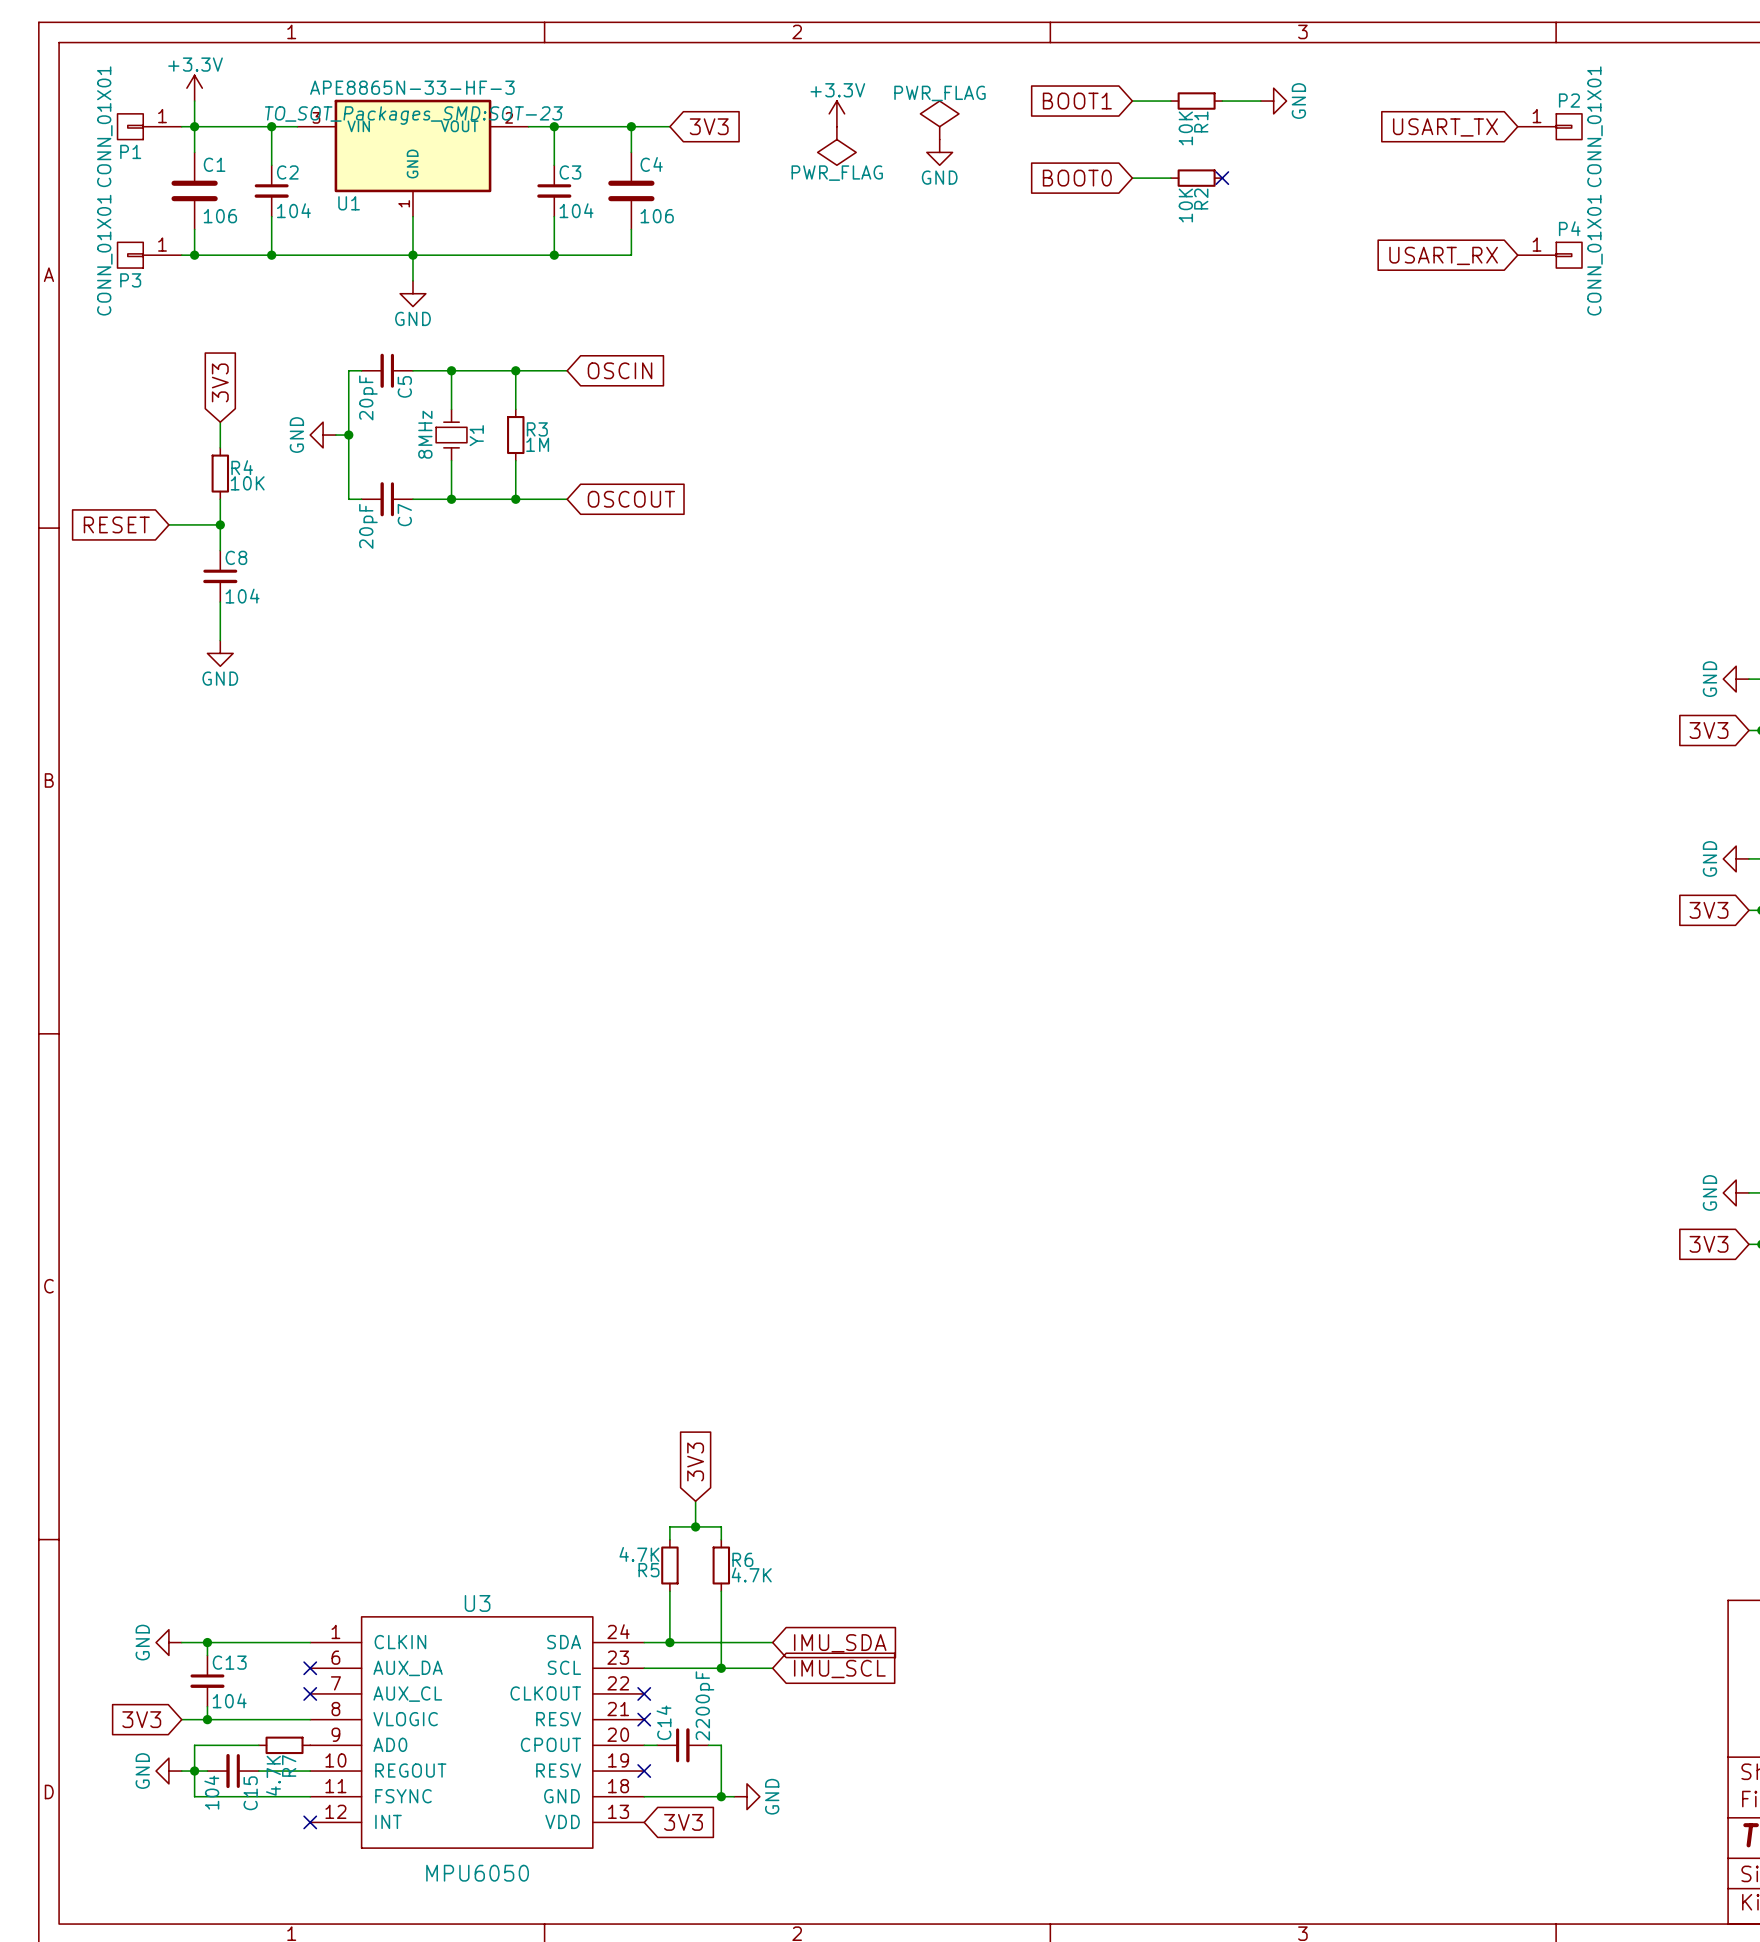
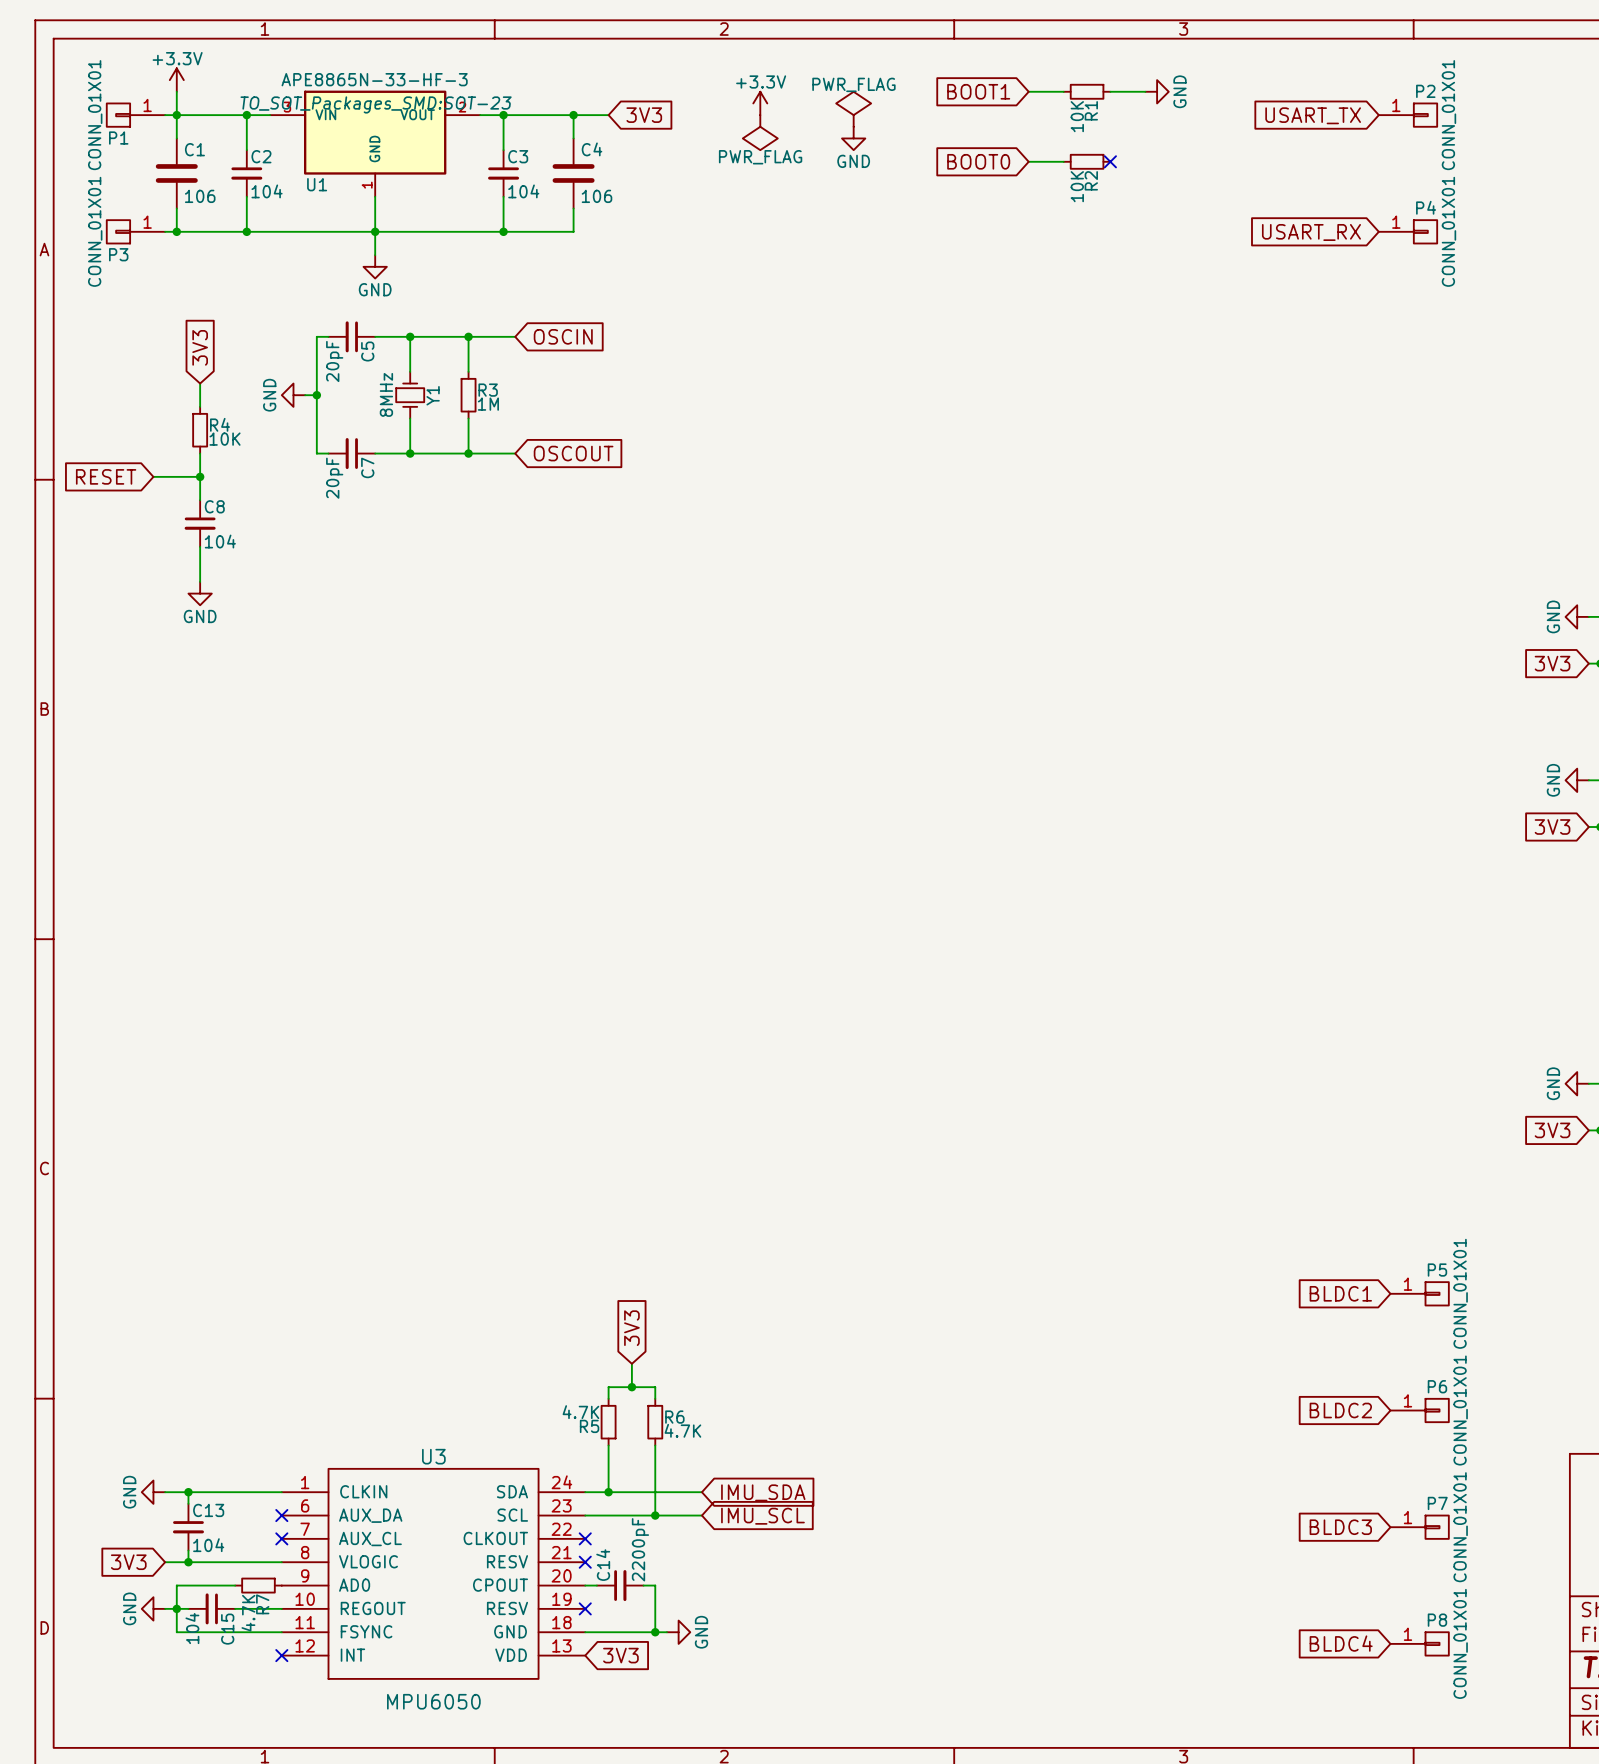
global label: none -> BLDC1 (1340, 1293)
P5: none -> CONN_01X01 (1419, 1293)
global label: none -> BLDC2 (1340, 1410)
P6: none -> CONN_01X01 (1419, 1410)
global label: none -> BLDC3 (1340, 1527)
P7: none -> CONN_01X01 (1419, 1527)
global label: none -> BLDC4 (1341, 1643)
P8: none -> CONN_01X01 (1419, 1643)

